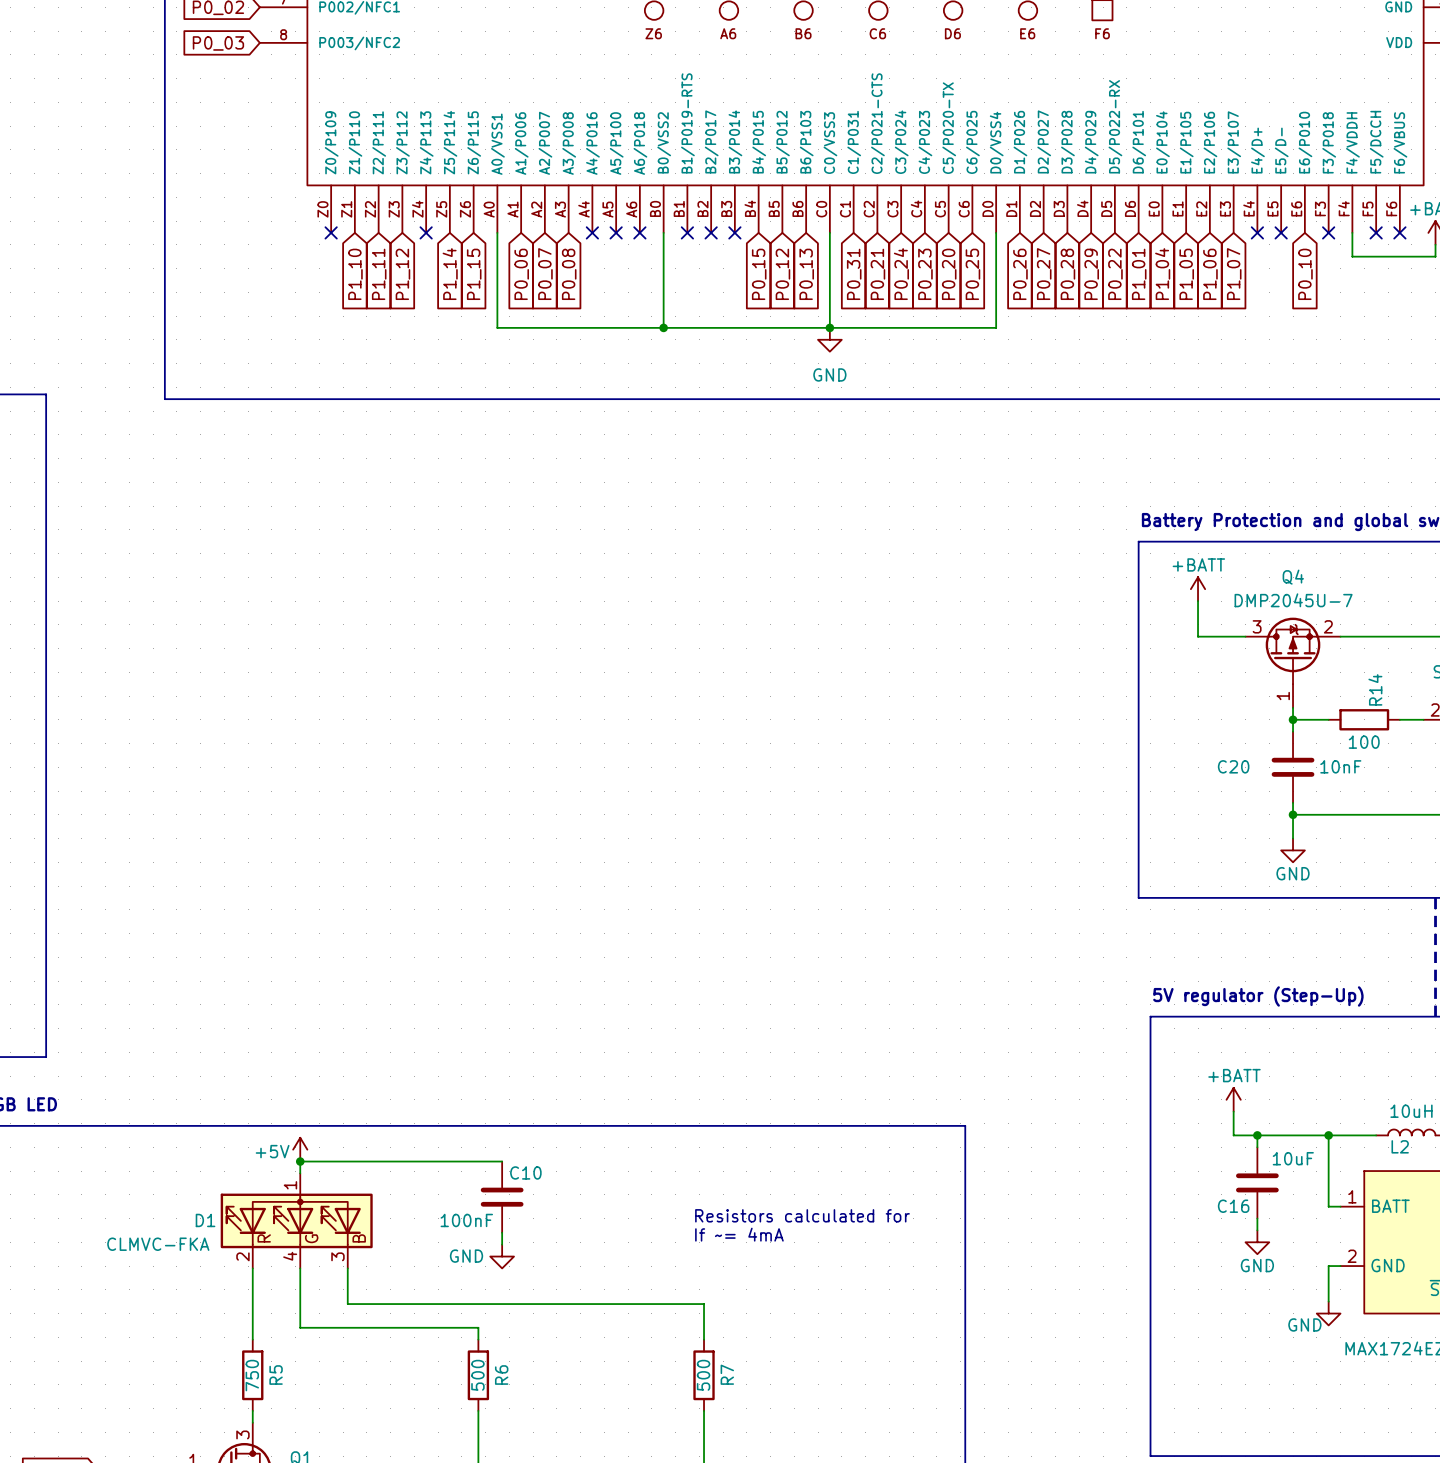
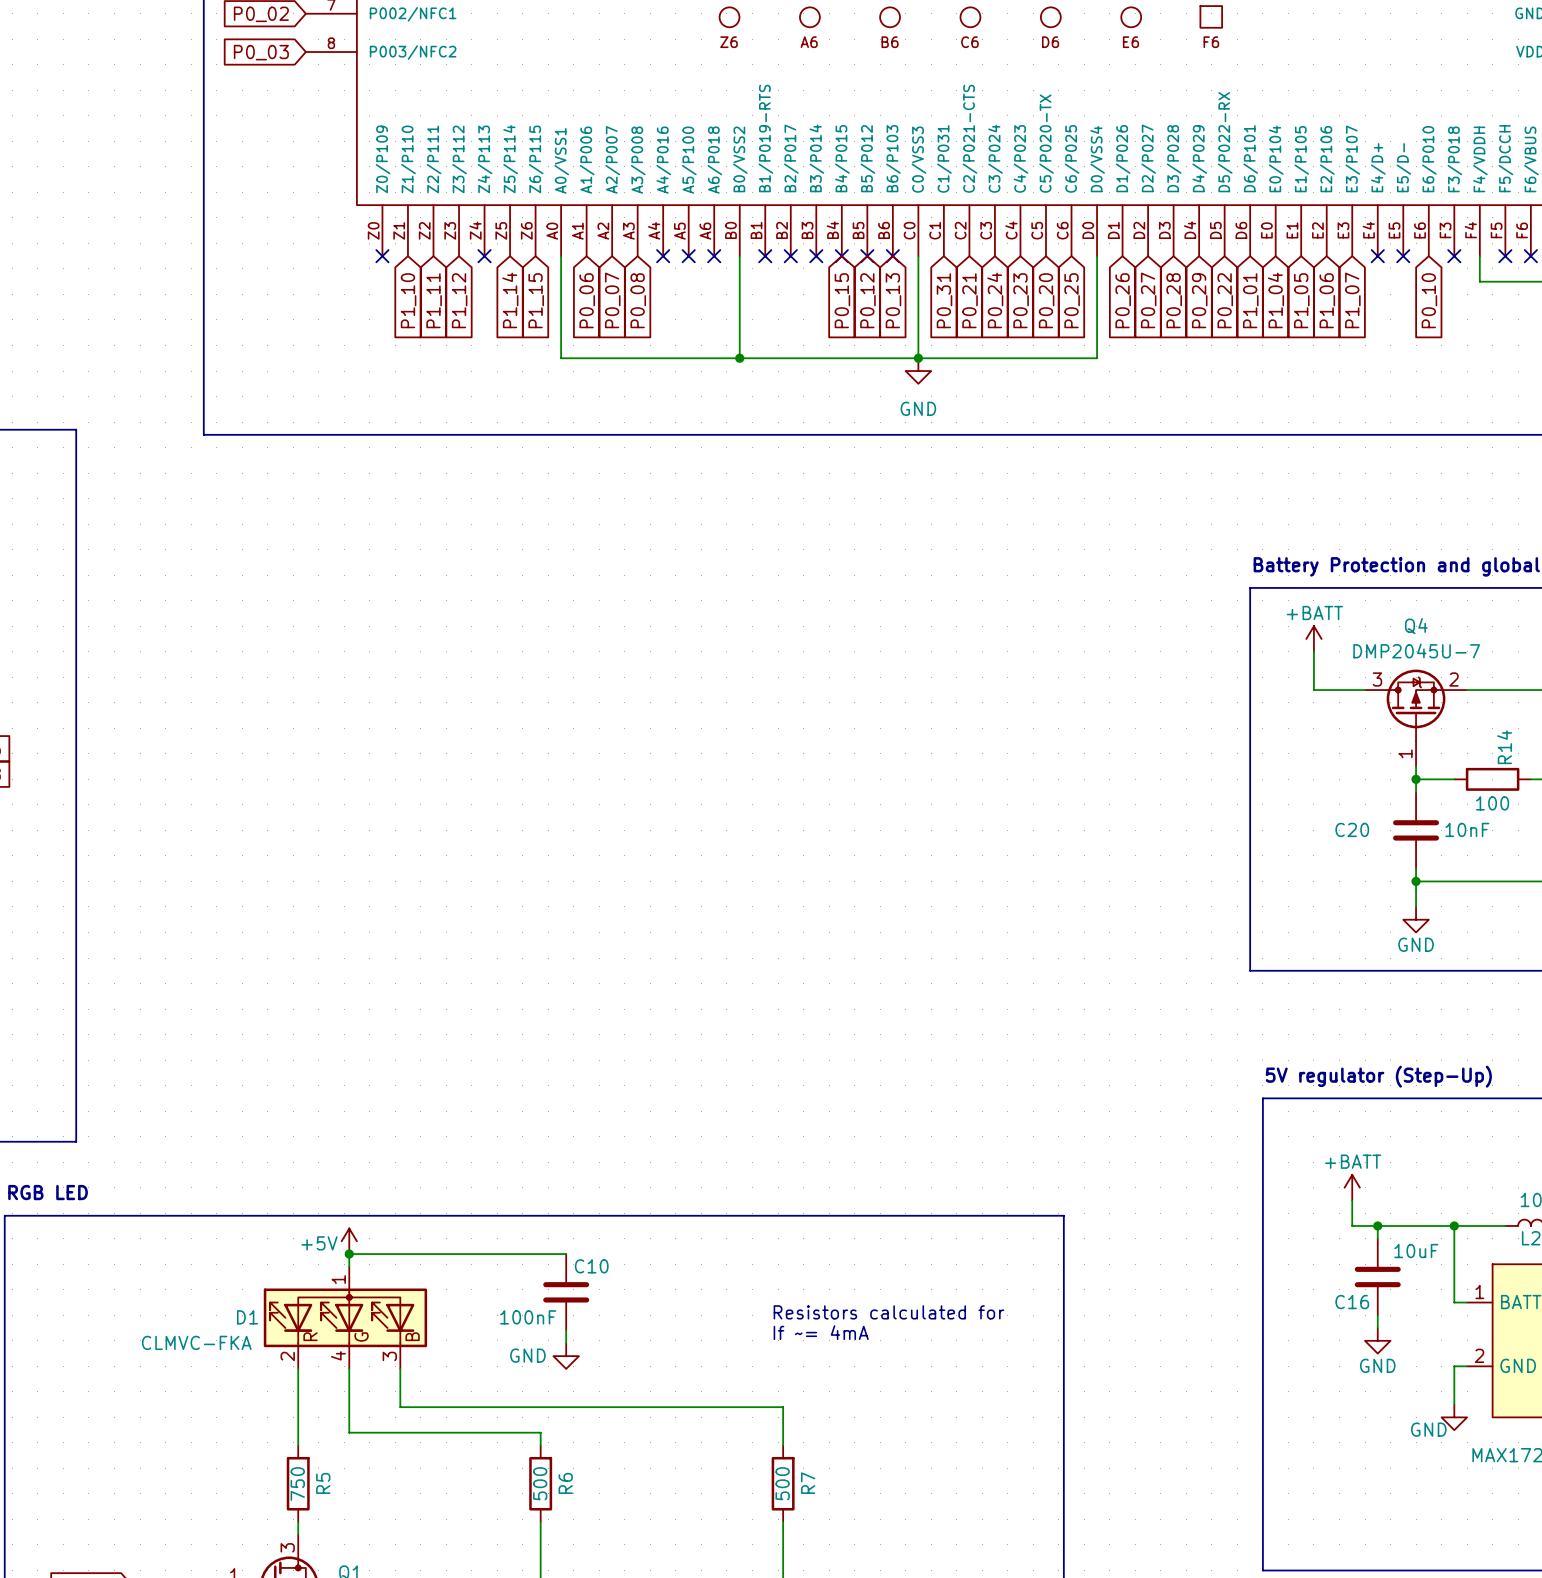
no-connect mark: none -> (841, 256)
no-connect mark: none -> (867, 256)
no-connect mark: none -> (892, 256)

